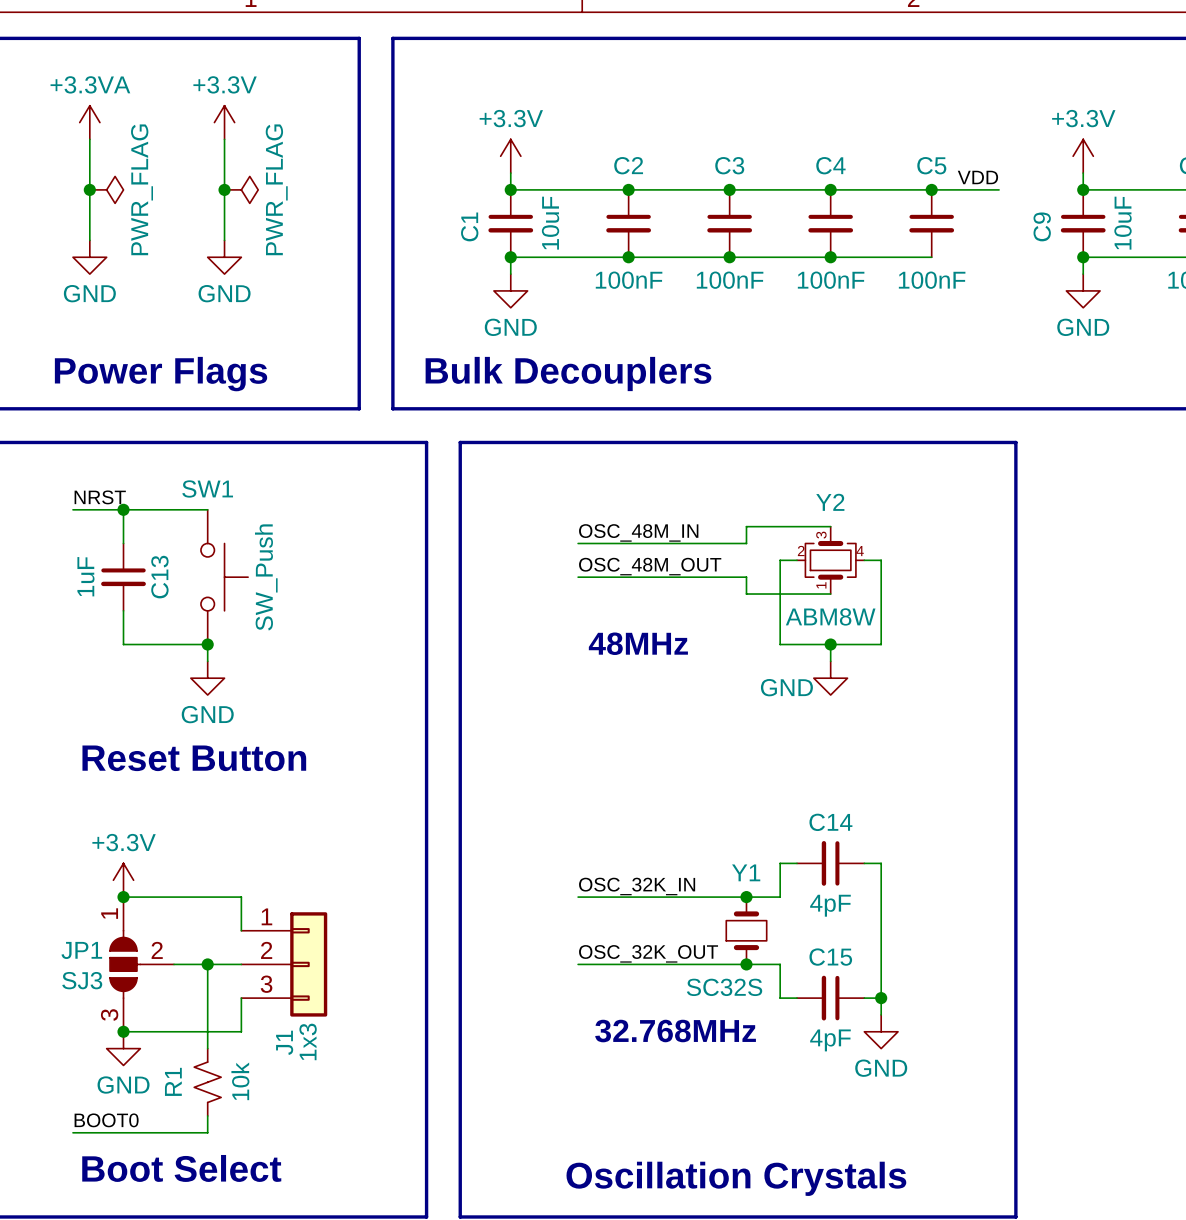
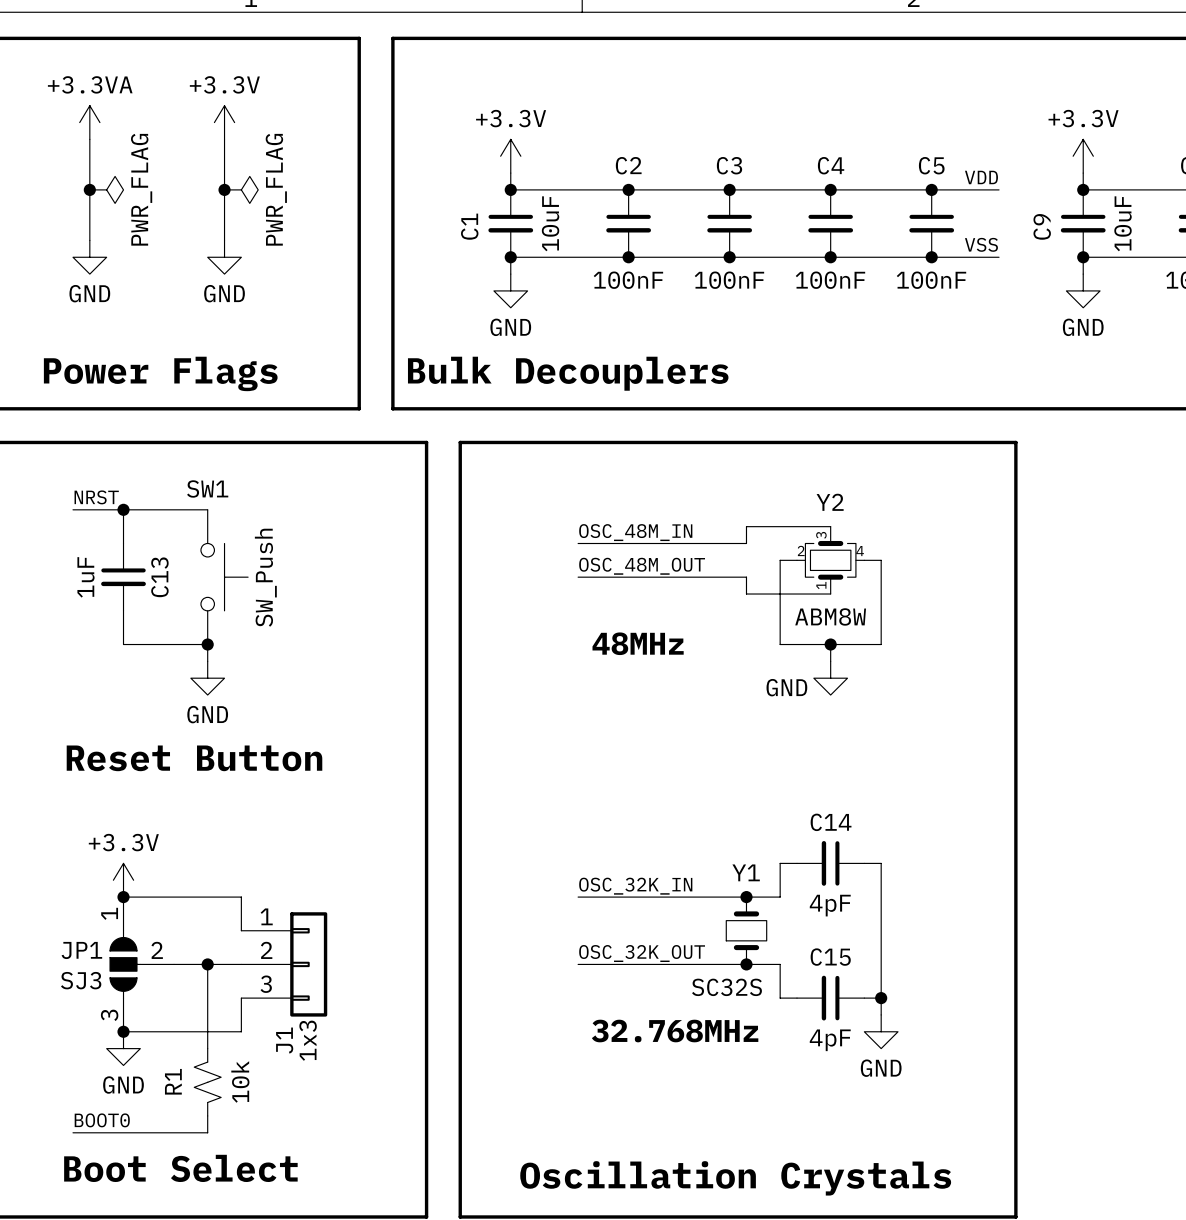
label: none -> VSS (981, 244)
wire: none -> (931, 257) (999, 257)
junction: none -> (931, 257)

